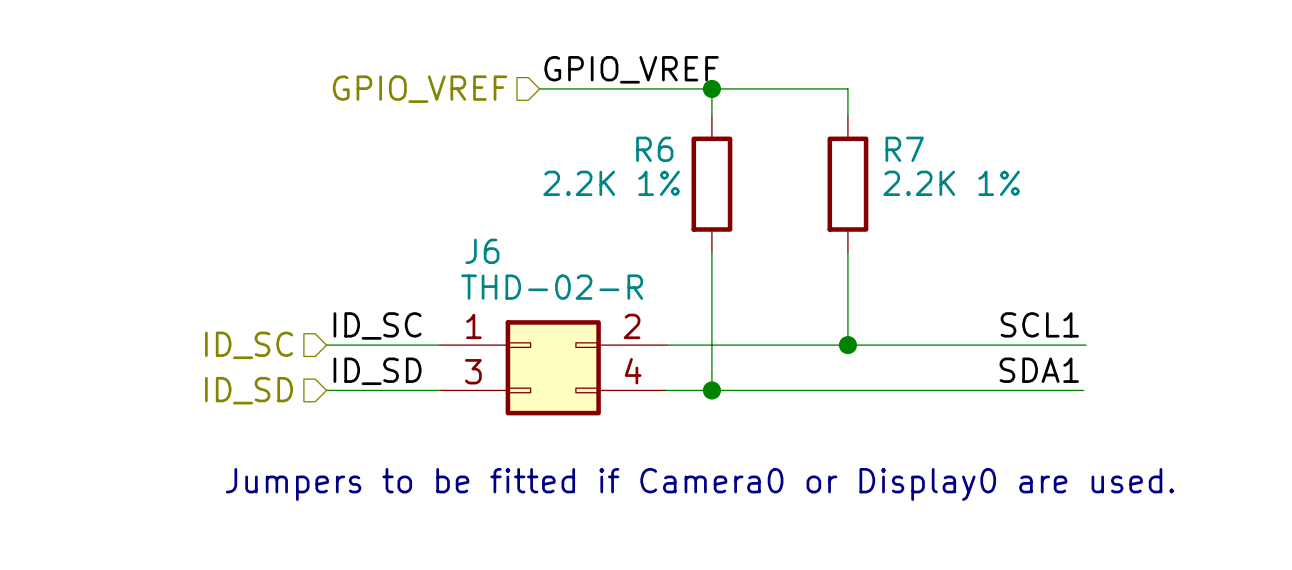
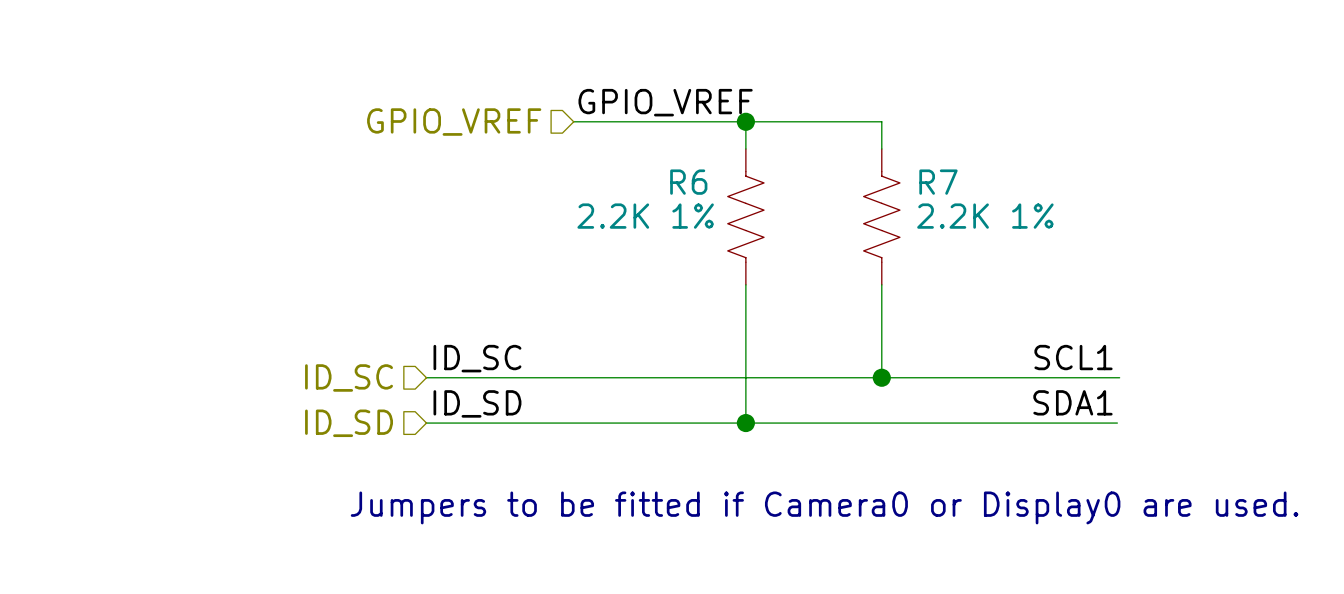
R6 symbol: [691, 116, 733, 253] -> [727, 148, 765, 285]
R7 symbol: [827, 116, 869, 253] -> [863, 148, 900, 285]
label position: ID_SC (377, 325) -> ID_SC (477, 358)
hierarchical label position: ID_SC (249, 345) -> ID_SC (349, 377)
wire: (326, 345) (392, 345) -> none
J6: THD-02-R (553, 367) -> none
label position: ID_SD (377, 371) -> ID_SD (477, 403)
hierarchical label position: ID_SD (249, 390) -> ID_SD (349, 423)
wire: (326, 390) (392, 390) -> none
text position: Jumpers to be fitted if Camera0 or Display0 are used. (699, 484) -> Jumpers to be fitted if Camera0 or Display0 are used. (824, 507)

